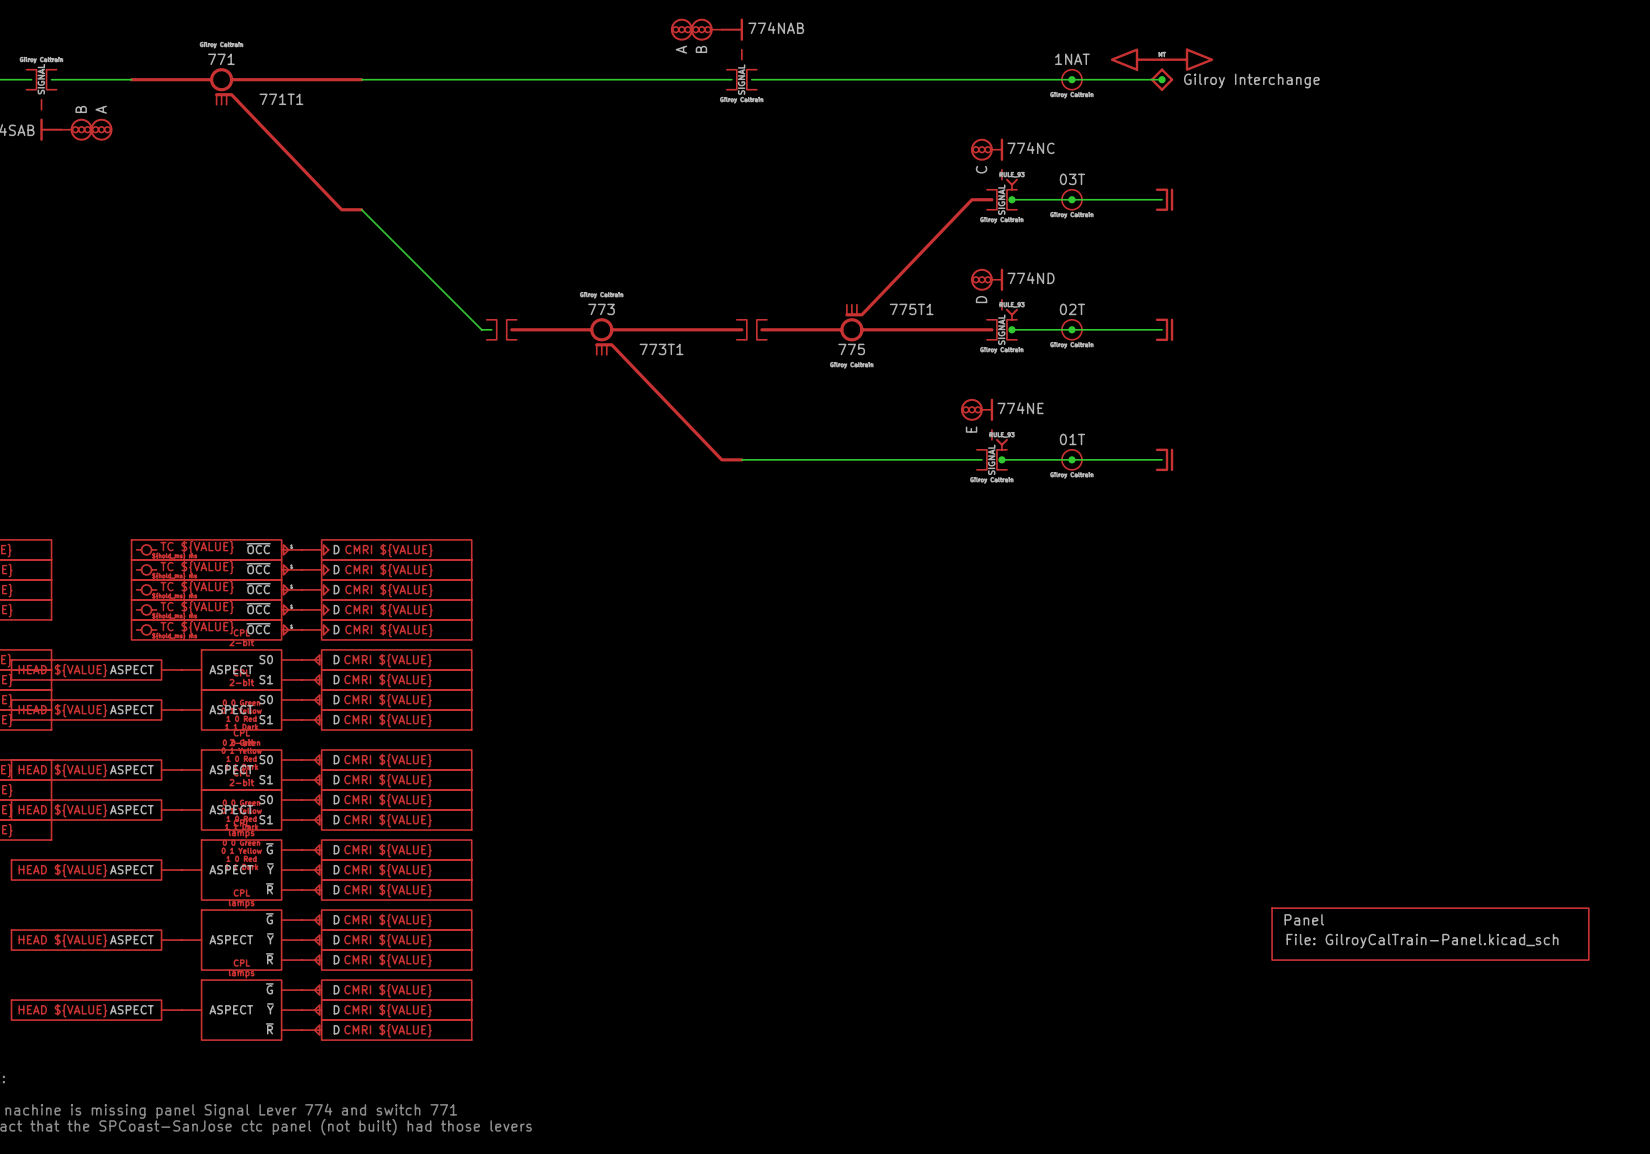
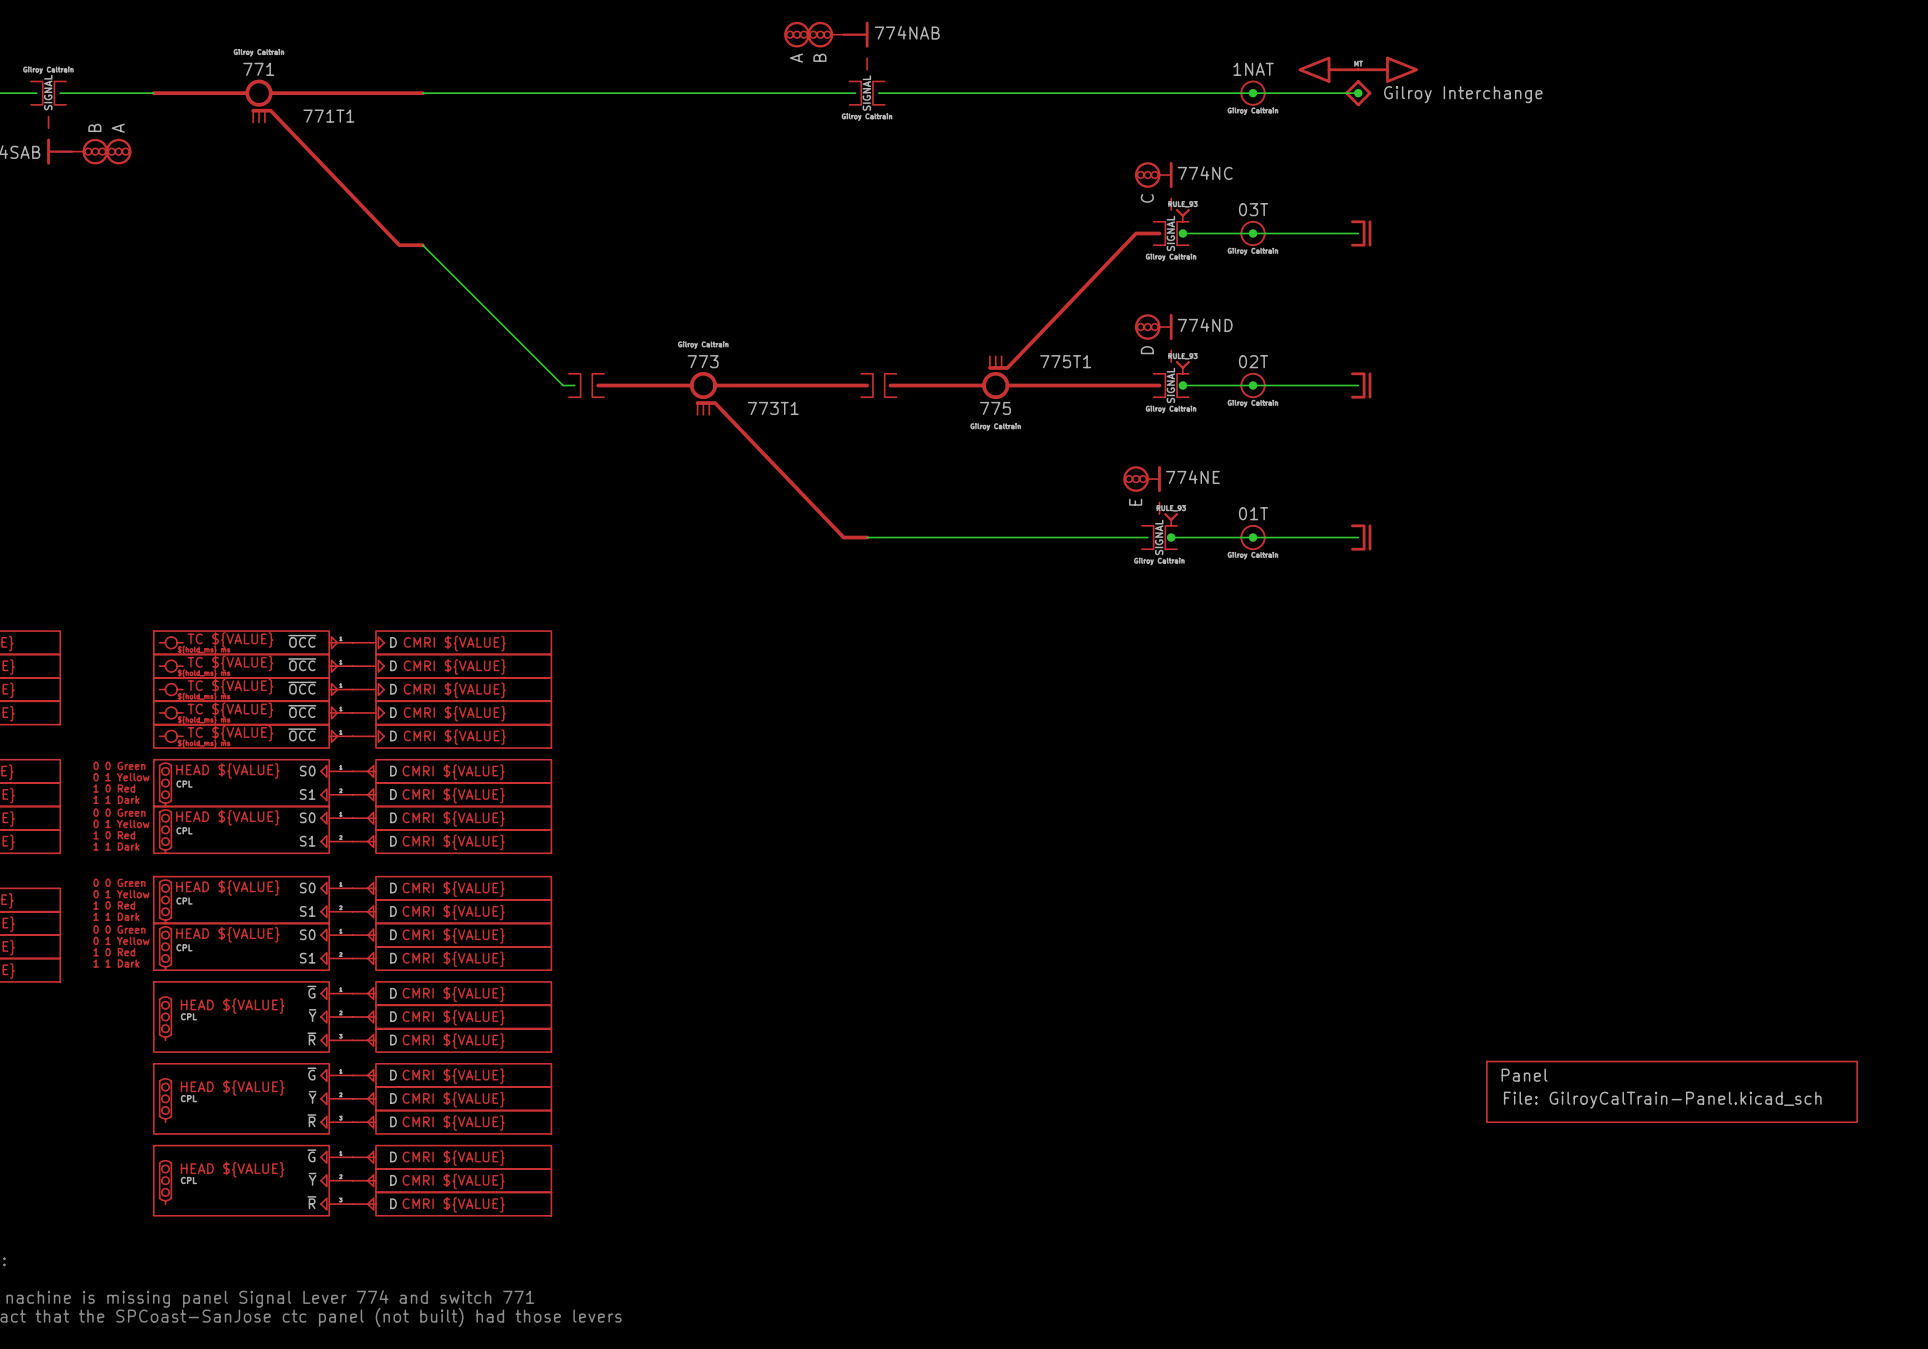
part: (96, 669) -> none
part: none -> (253, 783)
part: (241, 669) -> none
part: (96, 709) -> none
part: none -> (253, 829)
part: (241, 709) -> none
part: (96, 769) -> none
part: none -> (253, 900)
part: (241, 769) -> none
part: (96, 810) -> none
part: none -> (253, 946)
part: (241, 810) -> none
part: (96, 870) -> none
part: none -> (253, 1016)
part: (241, 870) -> none
part: (96, 940) -> none
part: none -> (253, 1098)
part: (241, 940) -> none
part: (96, 1010) -> none
part: none -> (253, 1180)
part: (241, 1010) -> none

